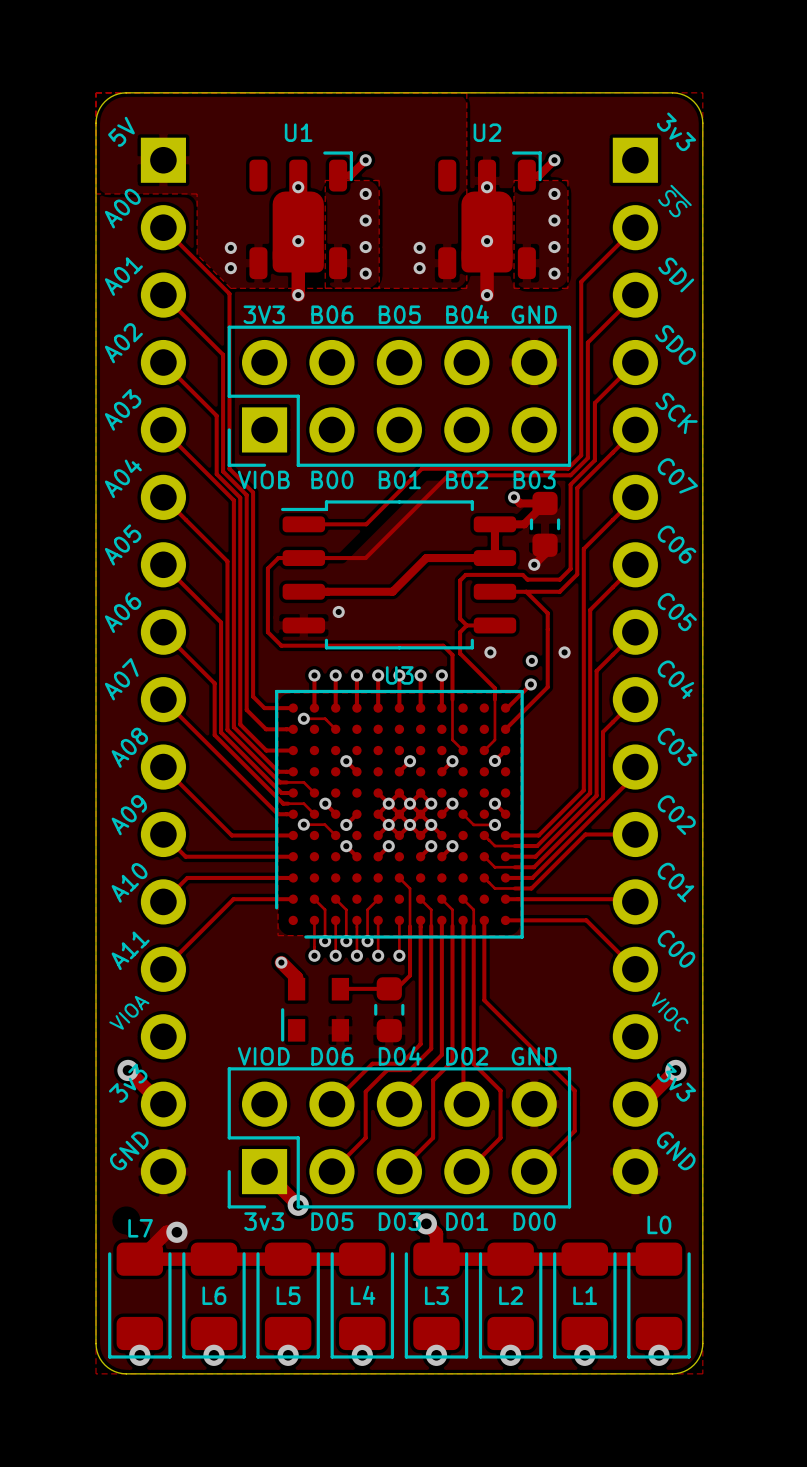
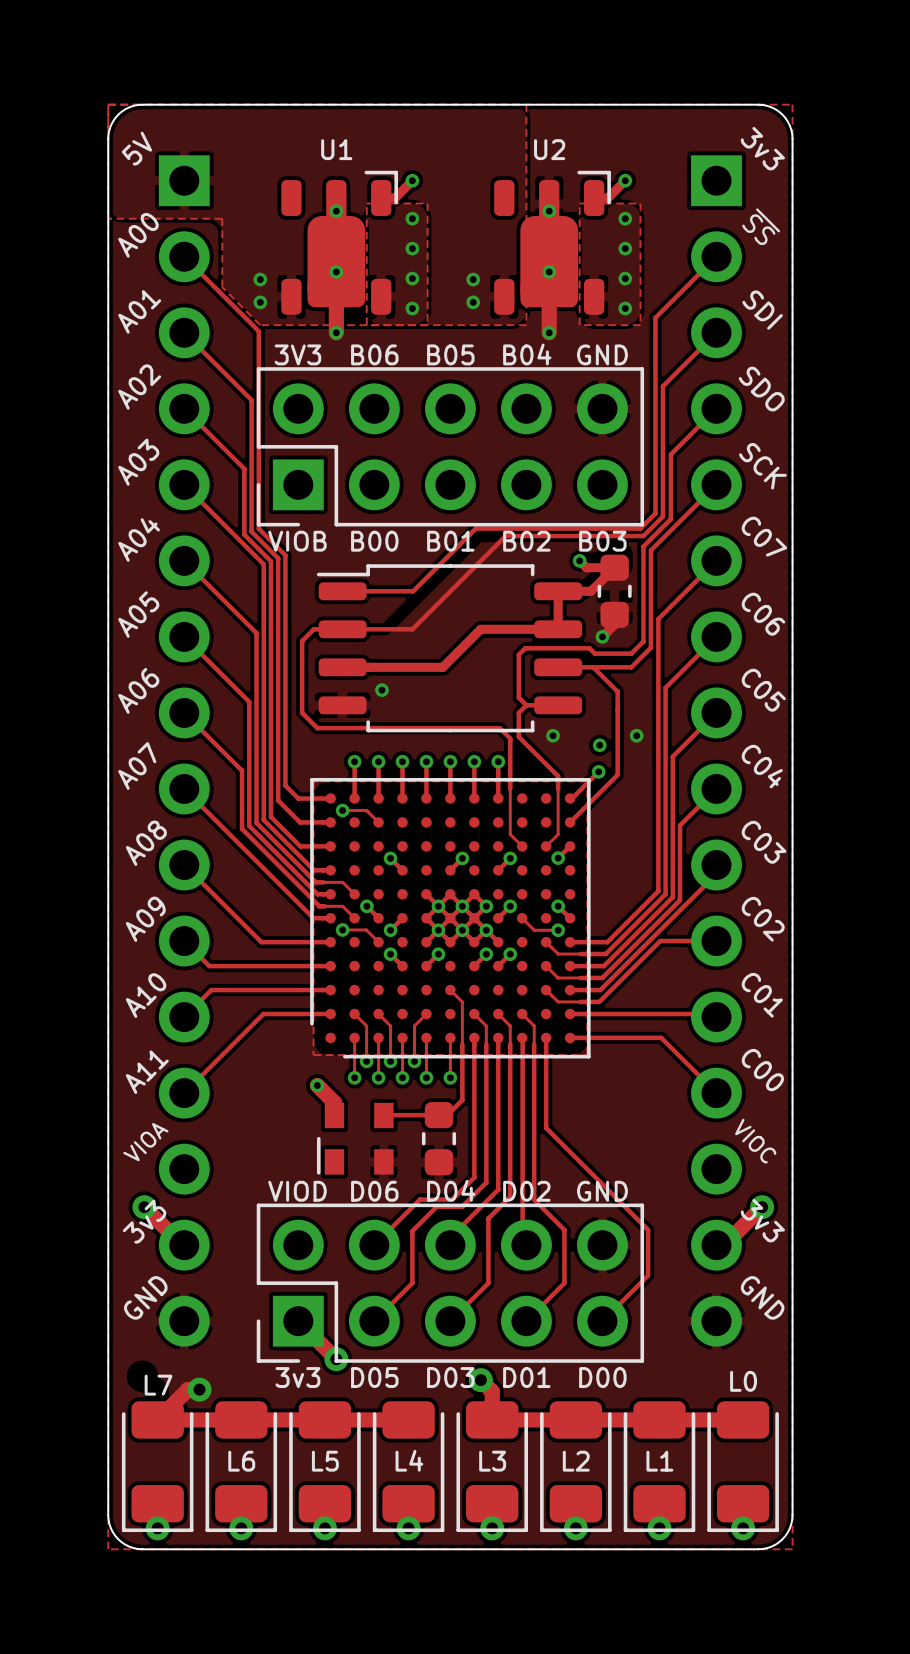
U3 name: U3 (399, 675) -> none

